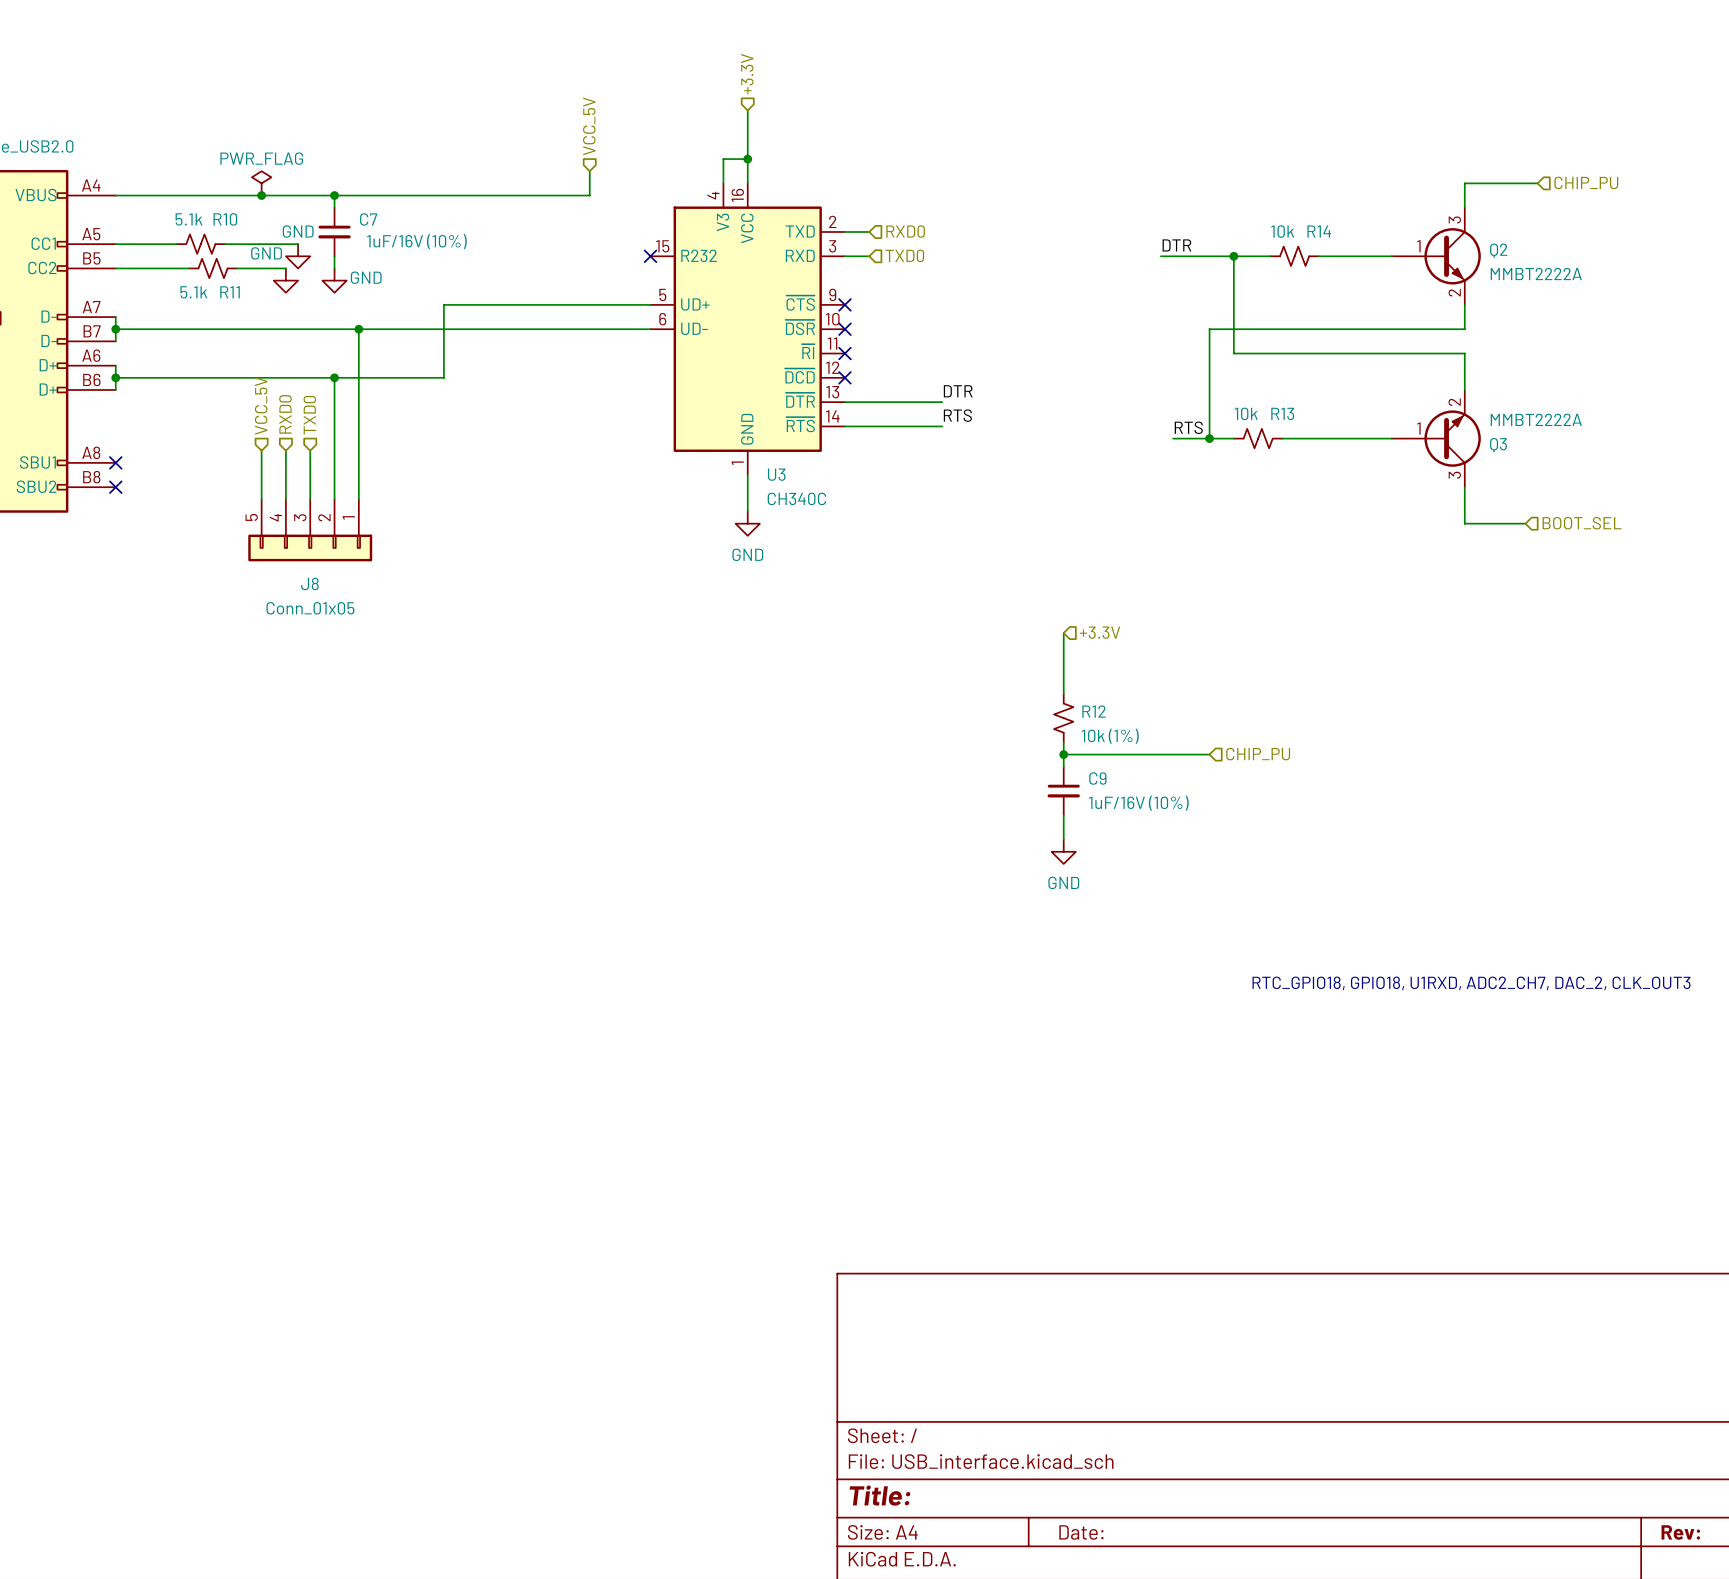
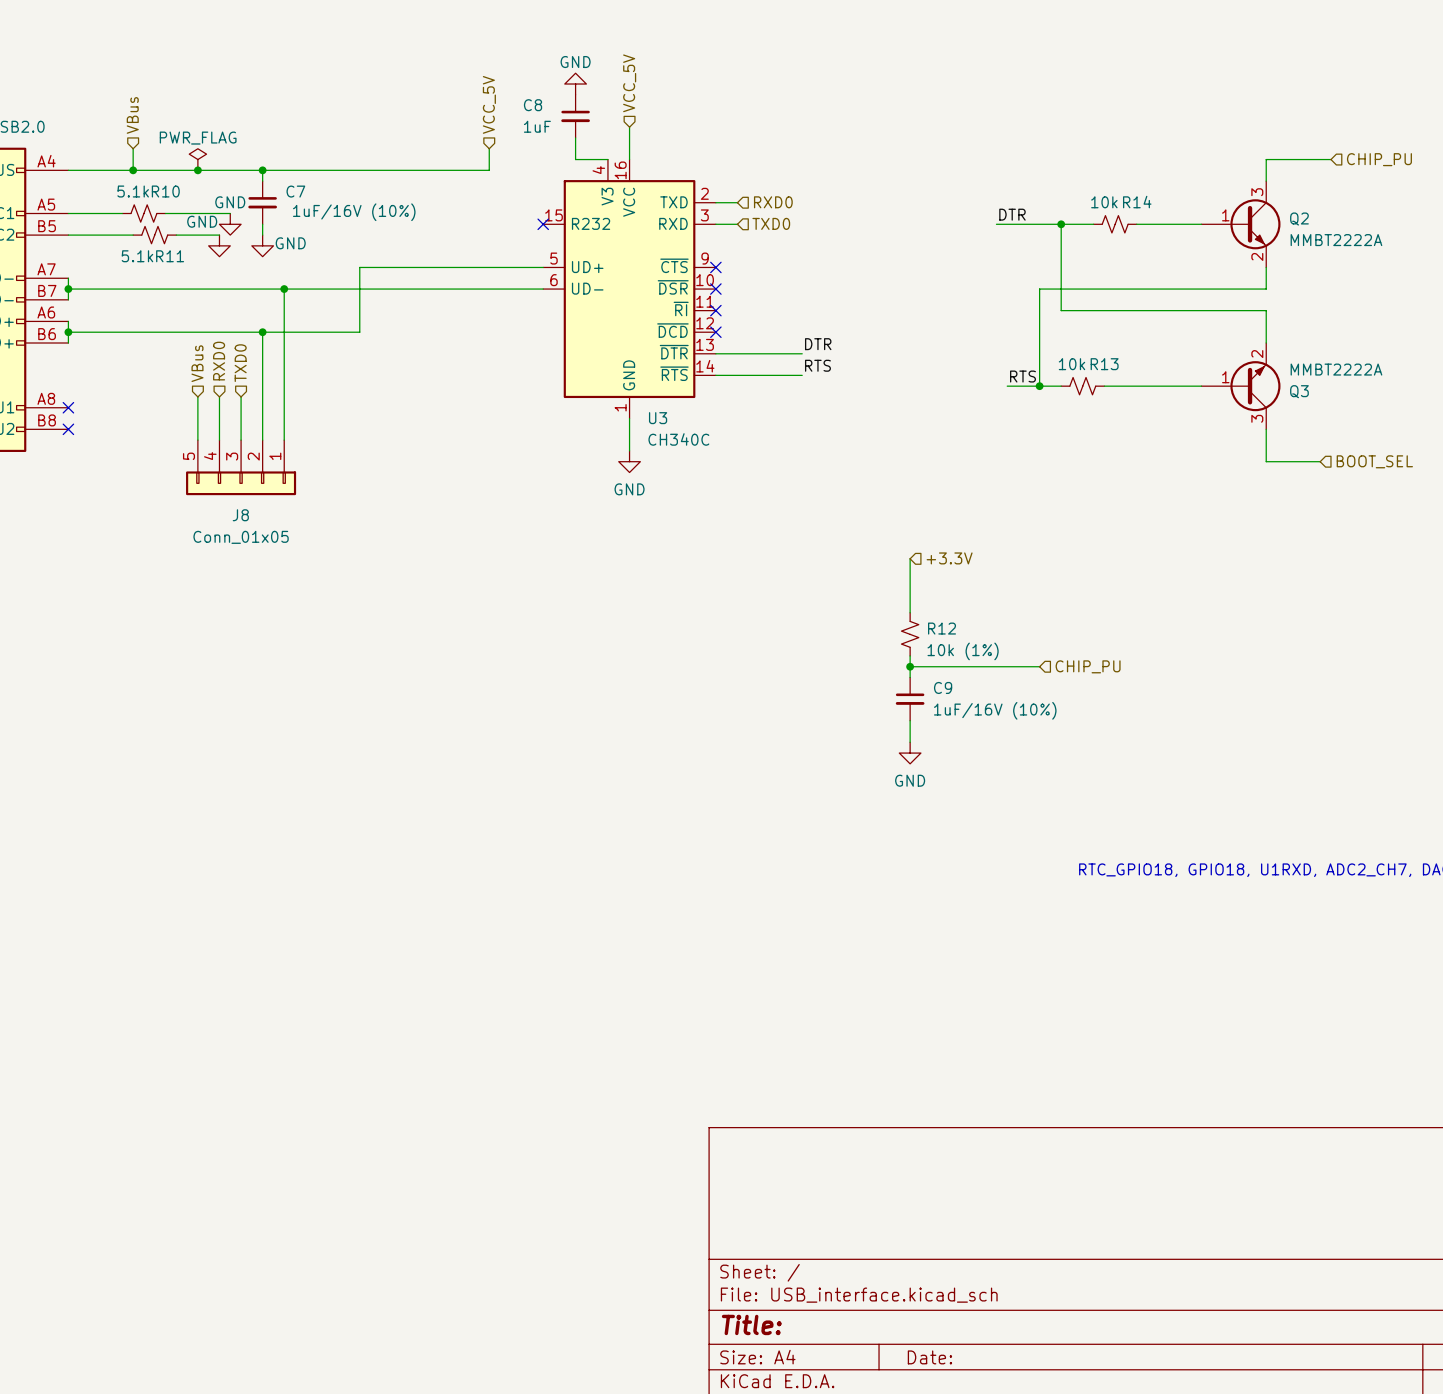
hierarchical label: +3.3V (747, 74) -> none
power symbol: none -> GND (575, 84)
hierarchical label: none -> VCC_5V (629, 83)
wire: (747, 110) (747, 146) -> none
C8: none -> 1uF (575, 116)
hierarchical label: none -> VBus (132, 115)
wire: (747, 159) (723, 159) (723, 183) -> (575, 137) (575, 159) (607, 159)
junction: (747, 159) -> none
wire: none -> (133, 148) (133, 170)
junction: none -> (133, 170)
hierarchical label: VCC_5V (261, 405) -> VBus (197, 363)

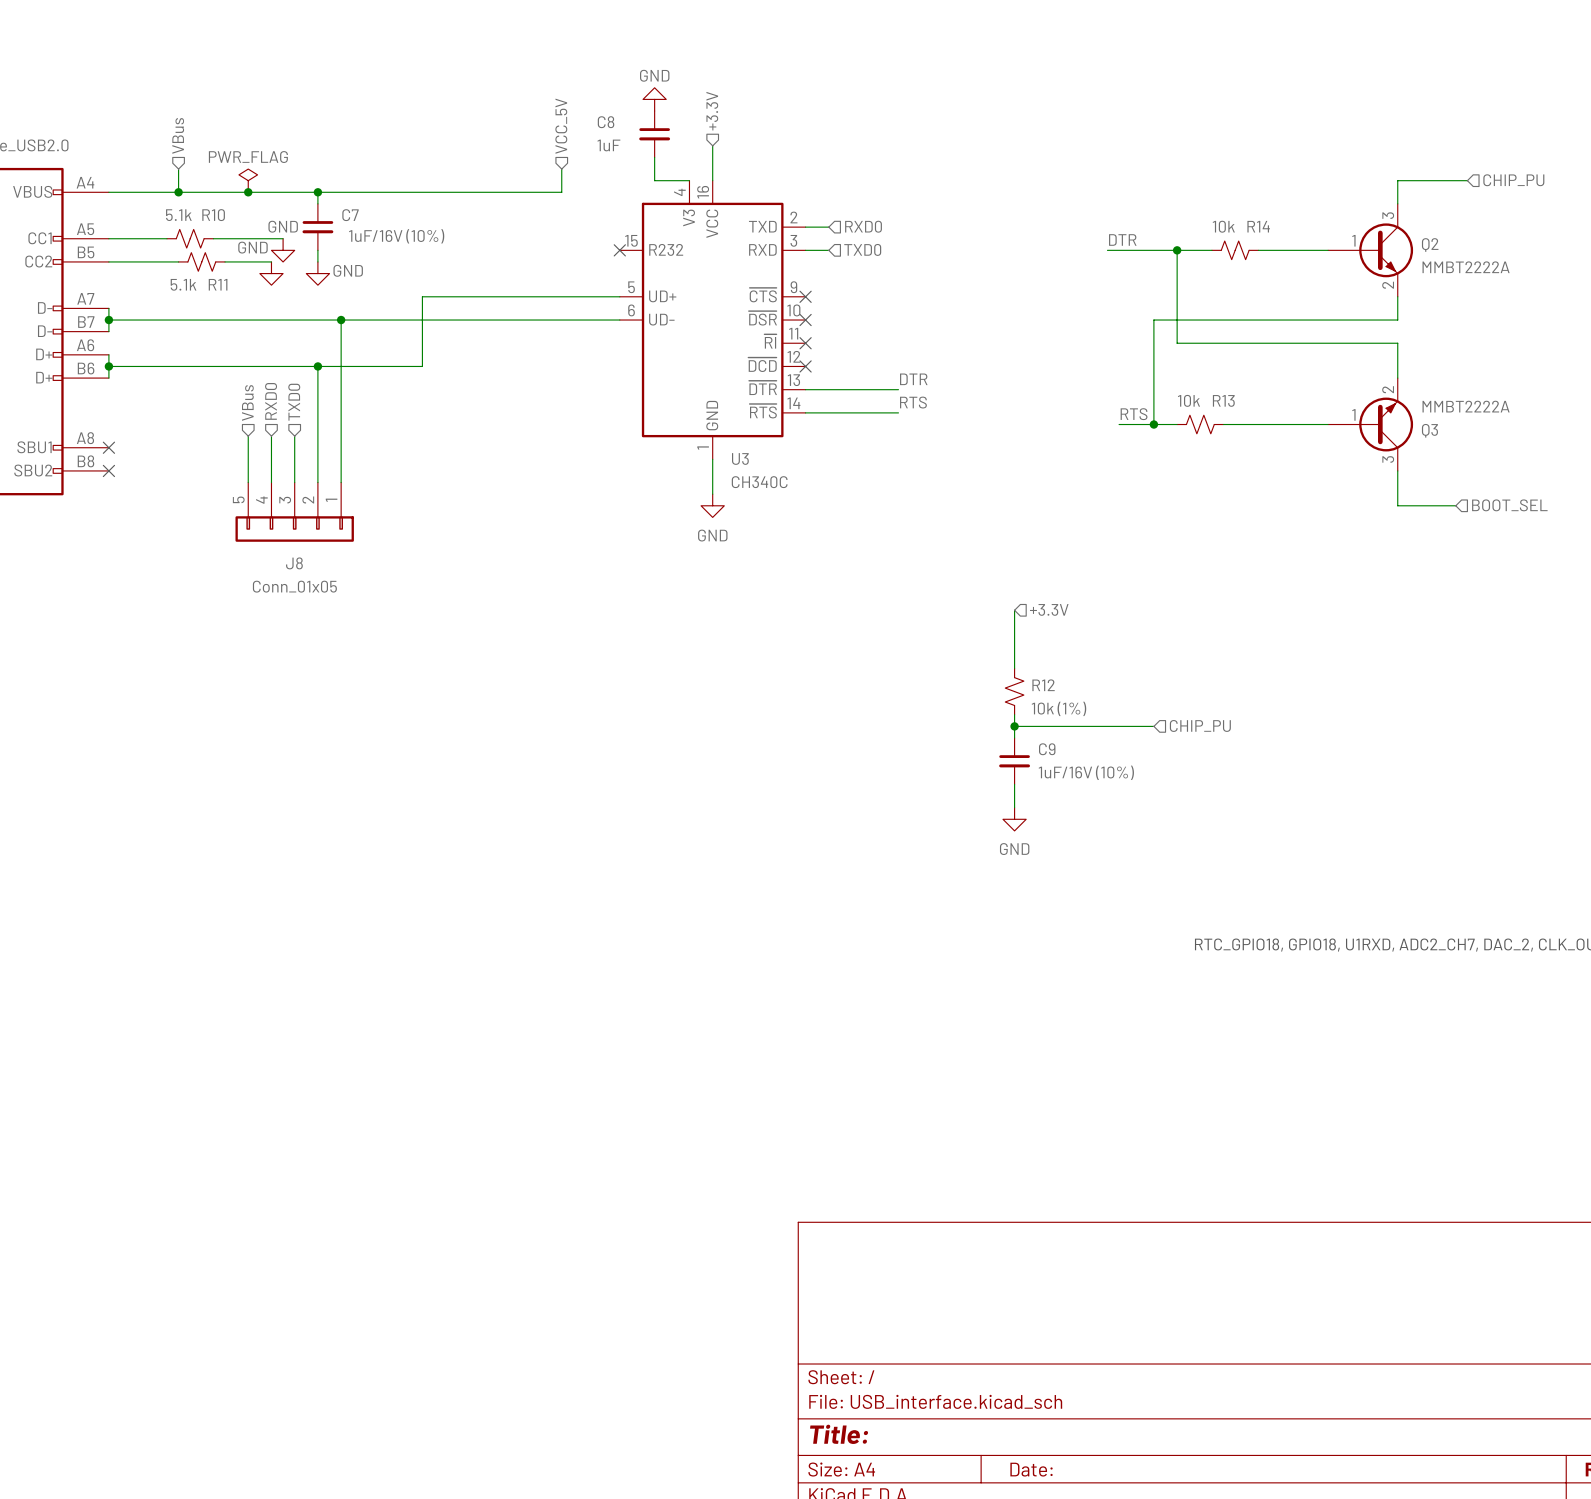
hierarchical label: VCC_5V (629, 83) -> +3.3V (712, 111)

